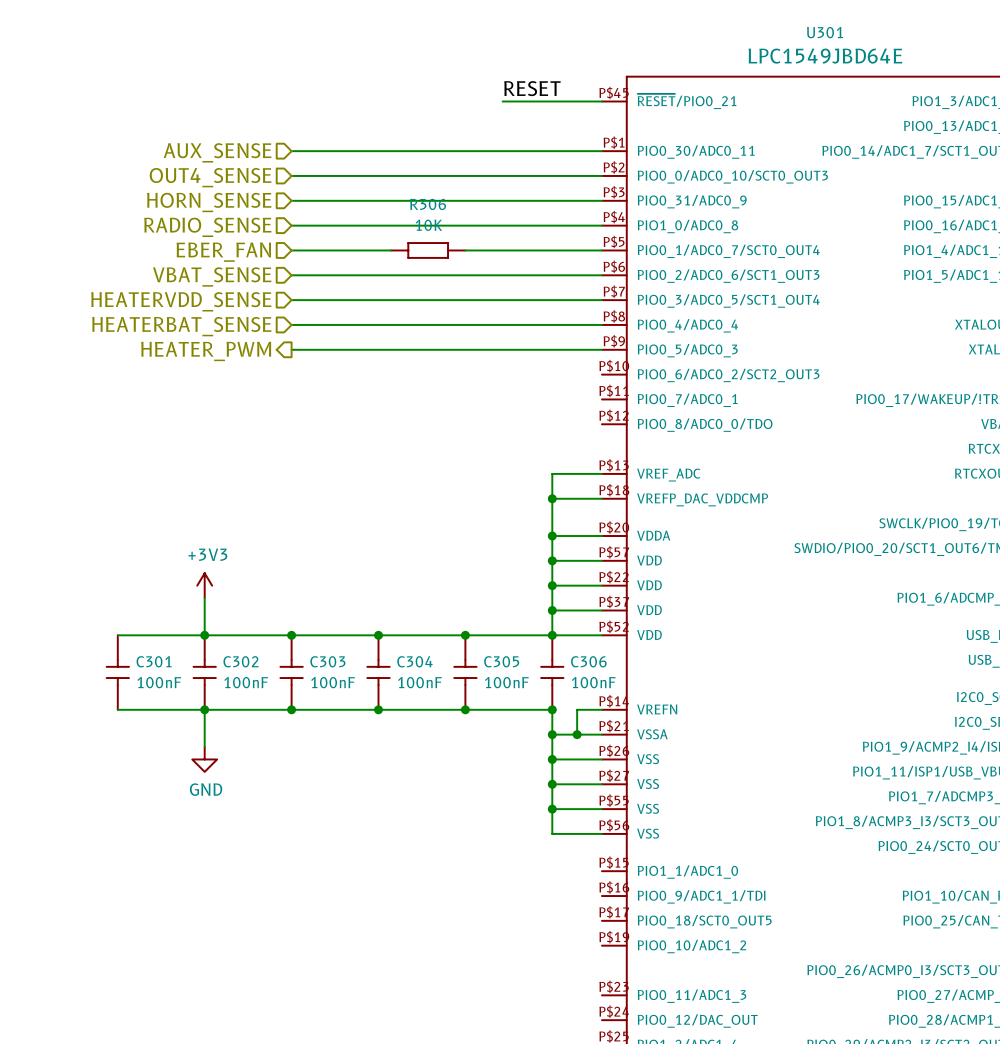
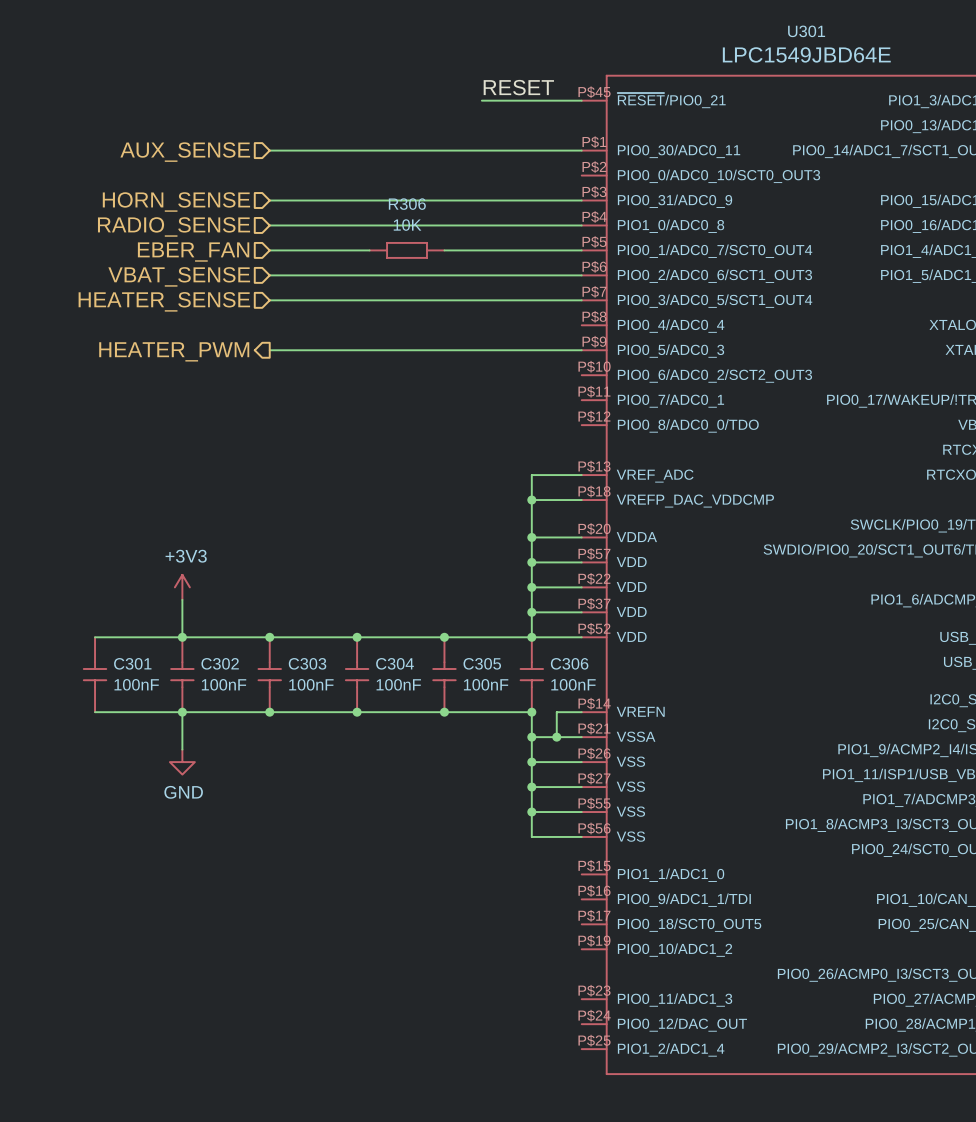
wire: (291, 175) (601, 175) -> none
hierarchical label: OUT4_SENSE (210, 177) -> none
hierarchical label: HEATERVDD_SENSE (181, 301) -> HEATER_SENSE (164, 301)
wire: (291, 324) (601, 324) -> none
hierarchical label: HEATERBAT_SENSE (181, 326) -> none

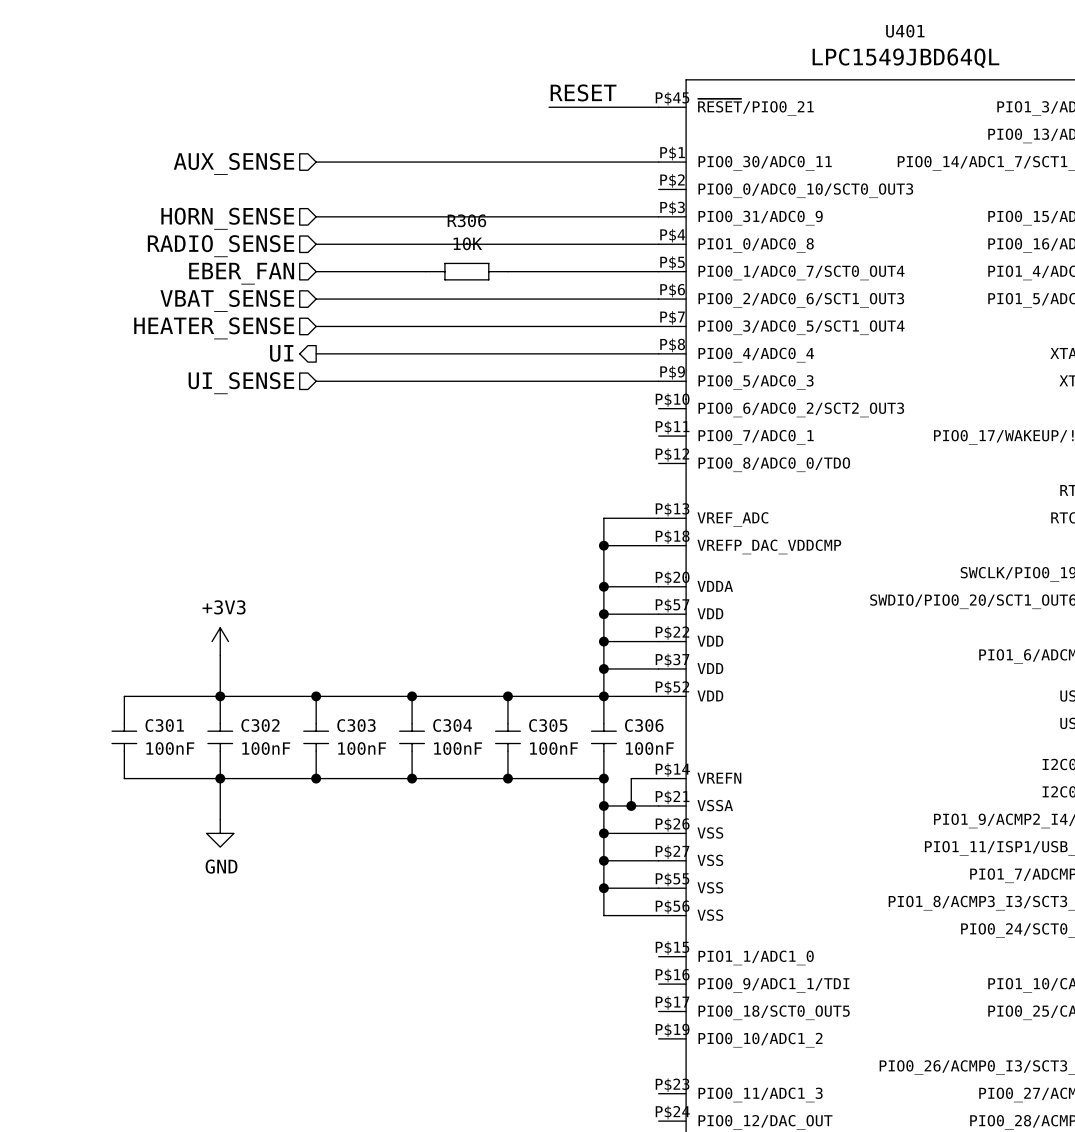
U301 name: U301 (806, 31) -> U401 (905, 31)
U301 text: LPC1549JBD64E (806, 54) -> LPC1549JBD64QL (905, 58)
hierarchical label: none -> UI (281, 353)
wire: none -> (316, 353) (658, 353)
hierarchical label shape: output (174, 351) -> input (241, 383)
hierarchical label: HEATER_PWM (174, 351) -> UI_SENSE (241, 383)

